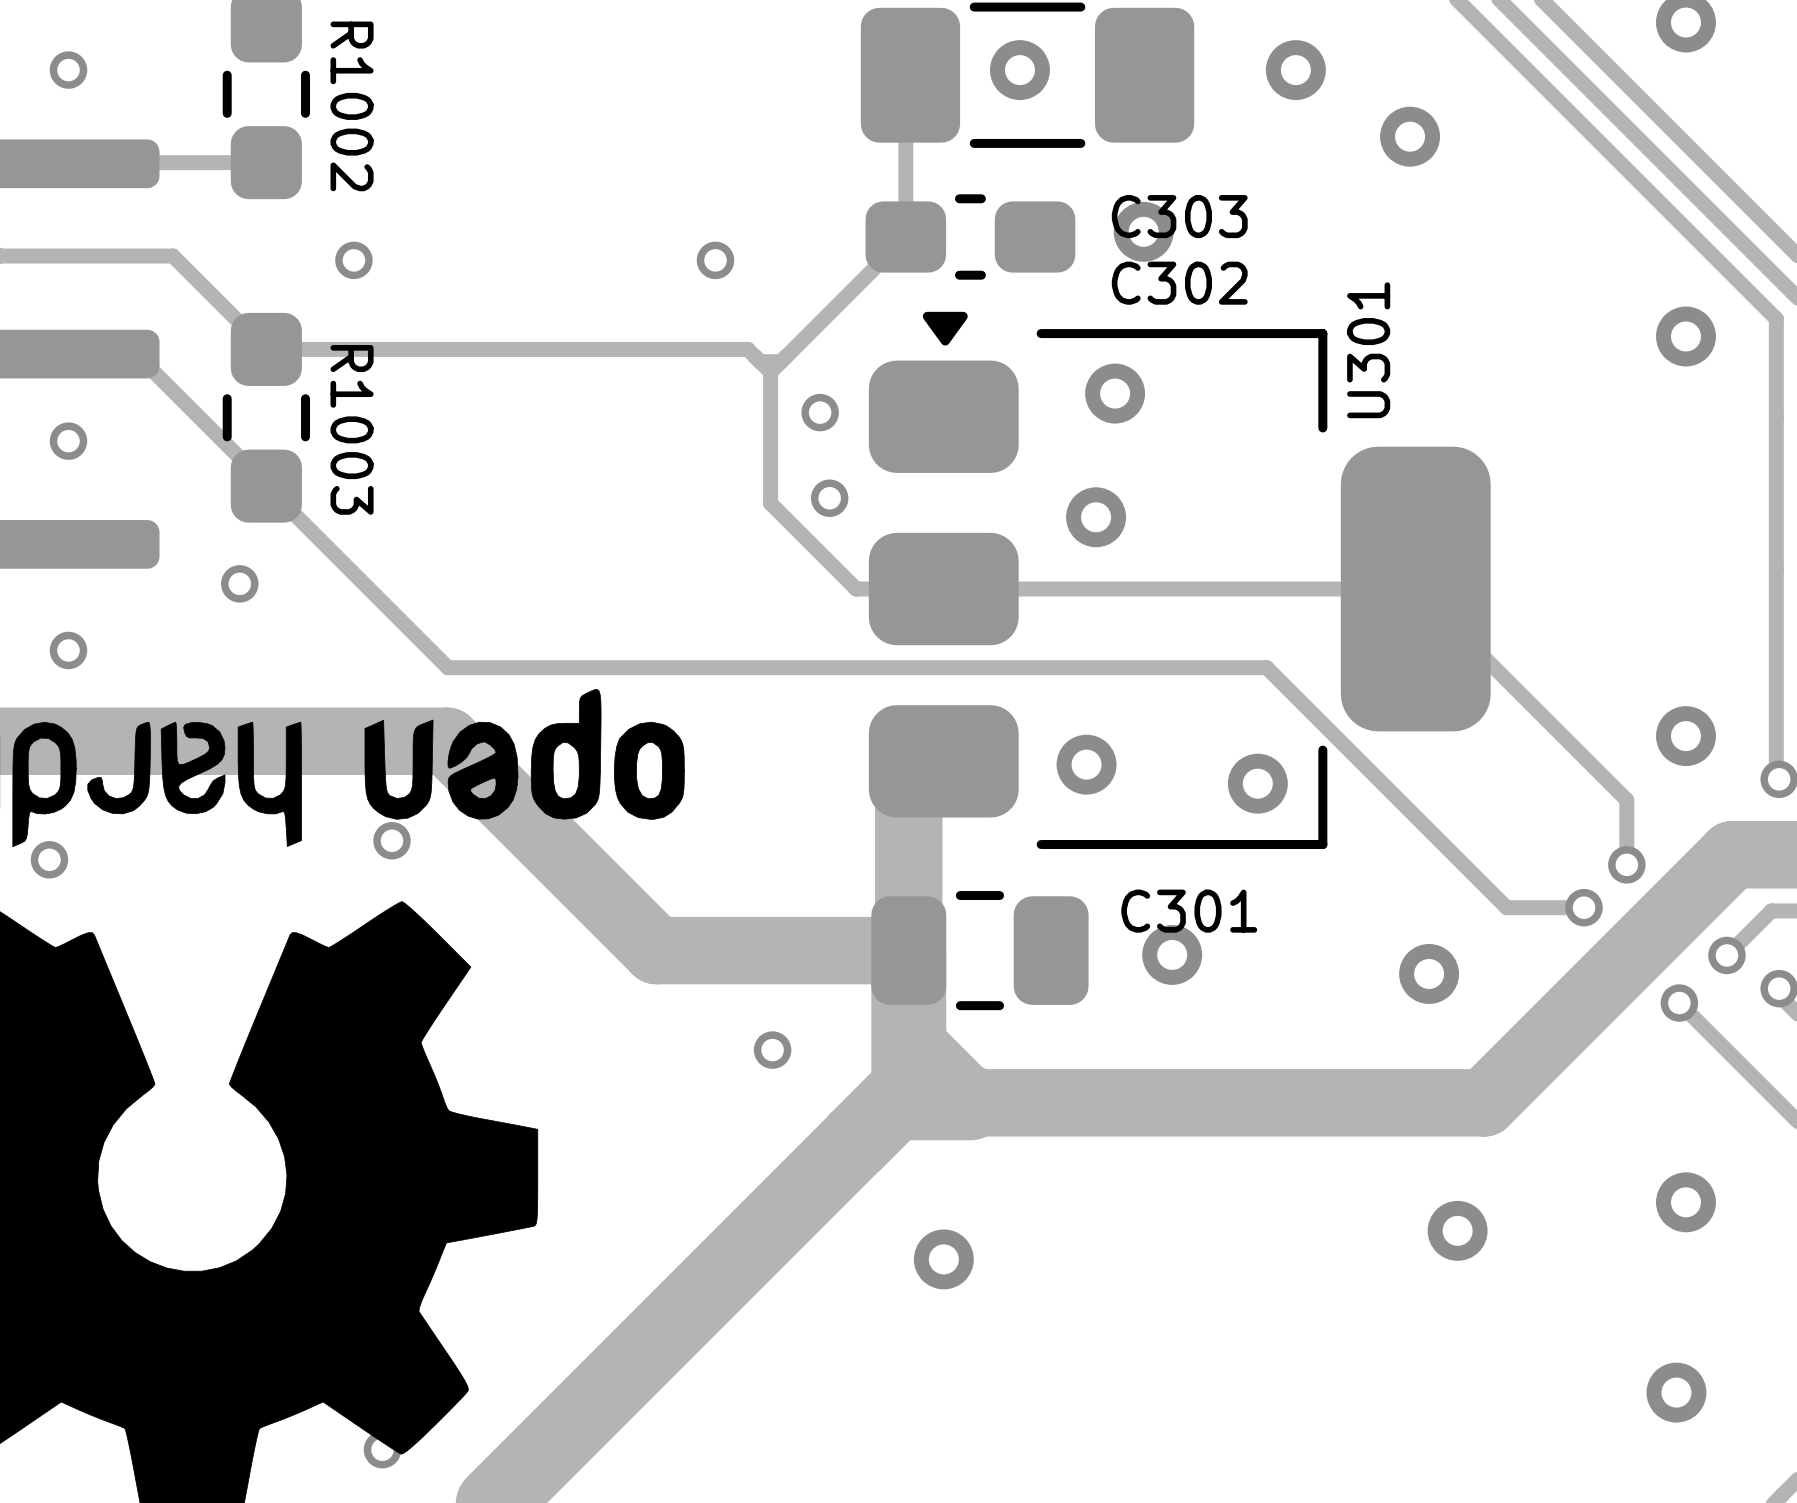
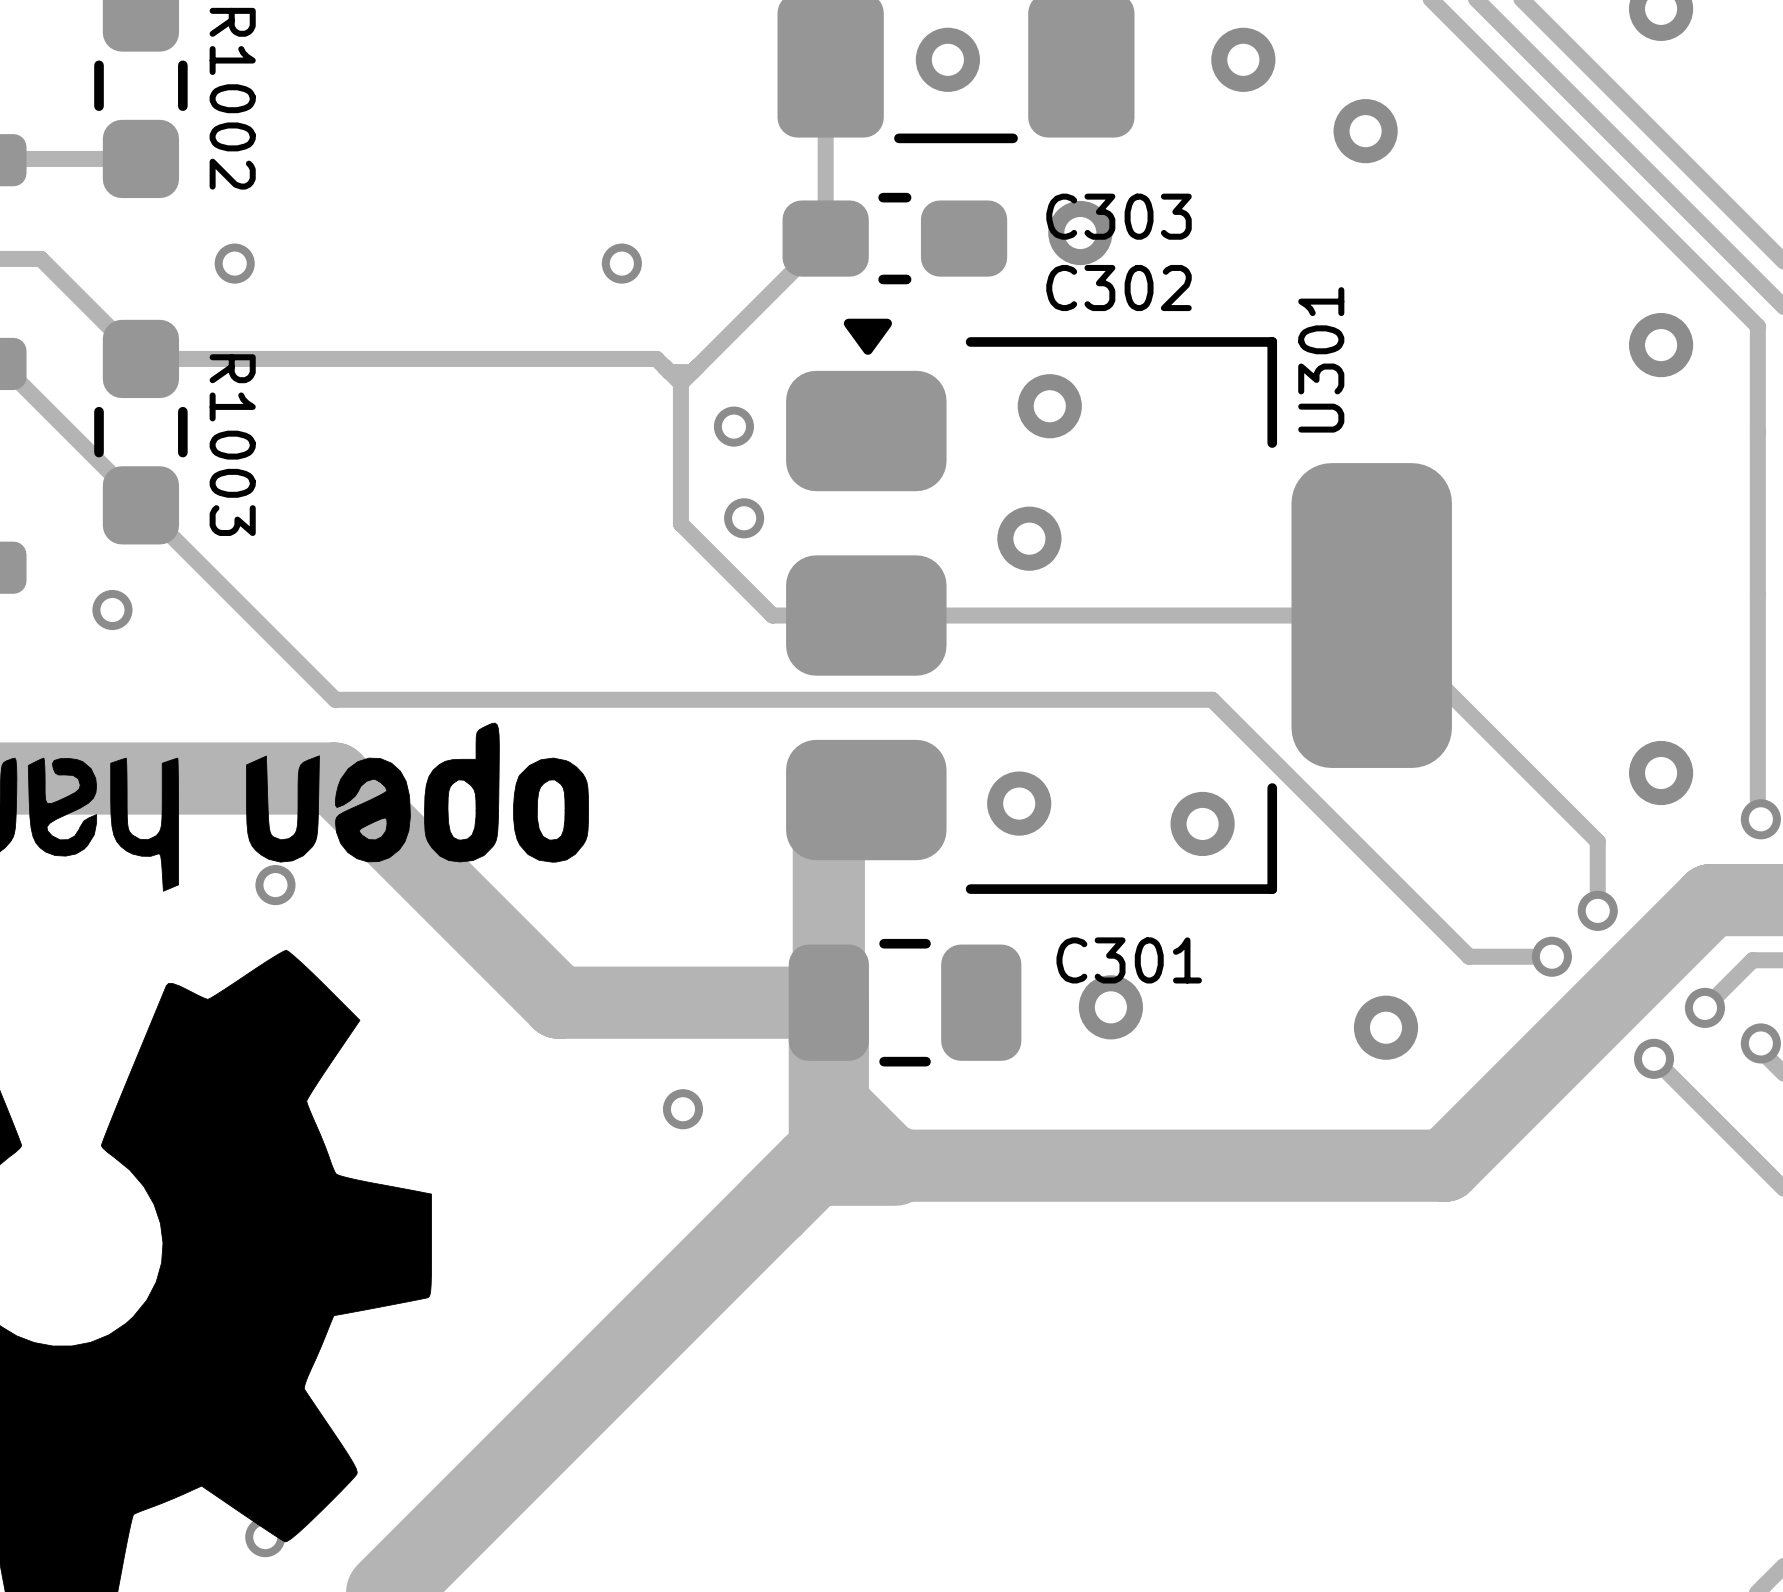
via: (1685, 1202) -> none
via: (1457, 1230) -> none
via: (943, 1259) -> none
via: (1676, 1392) -> none

